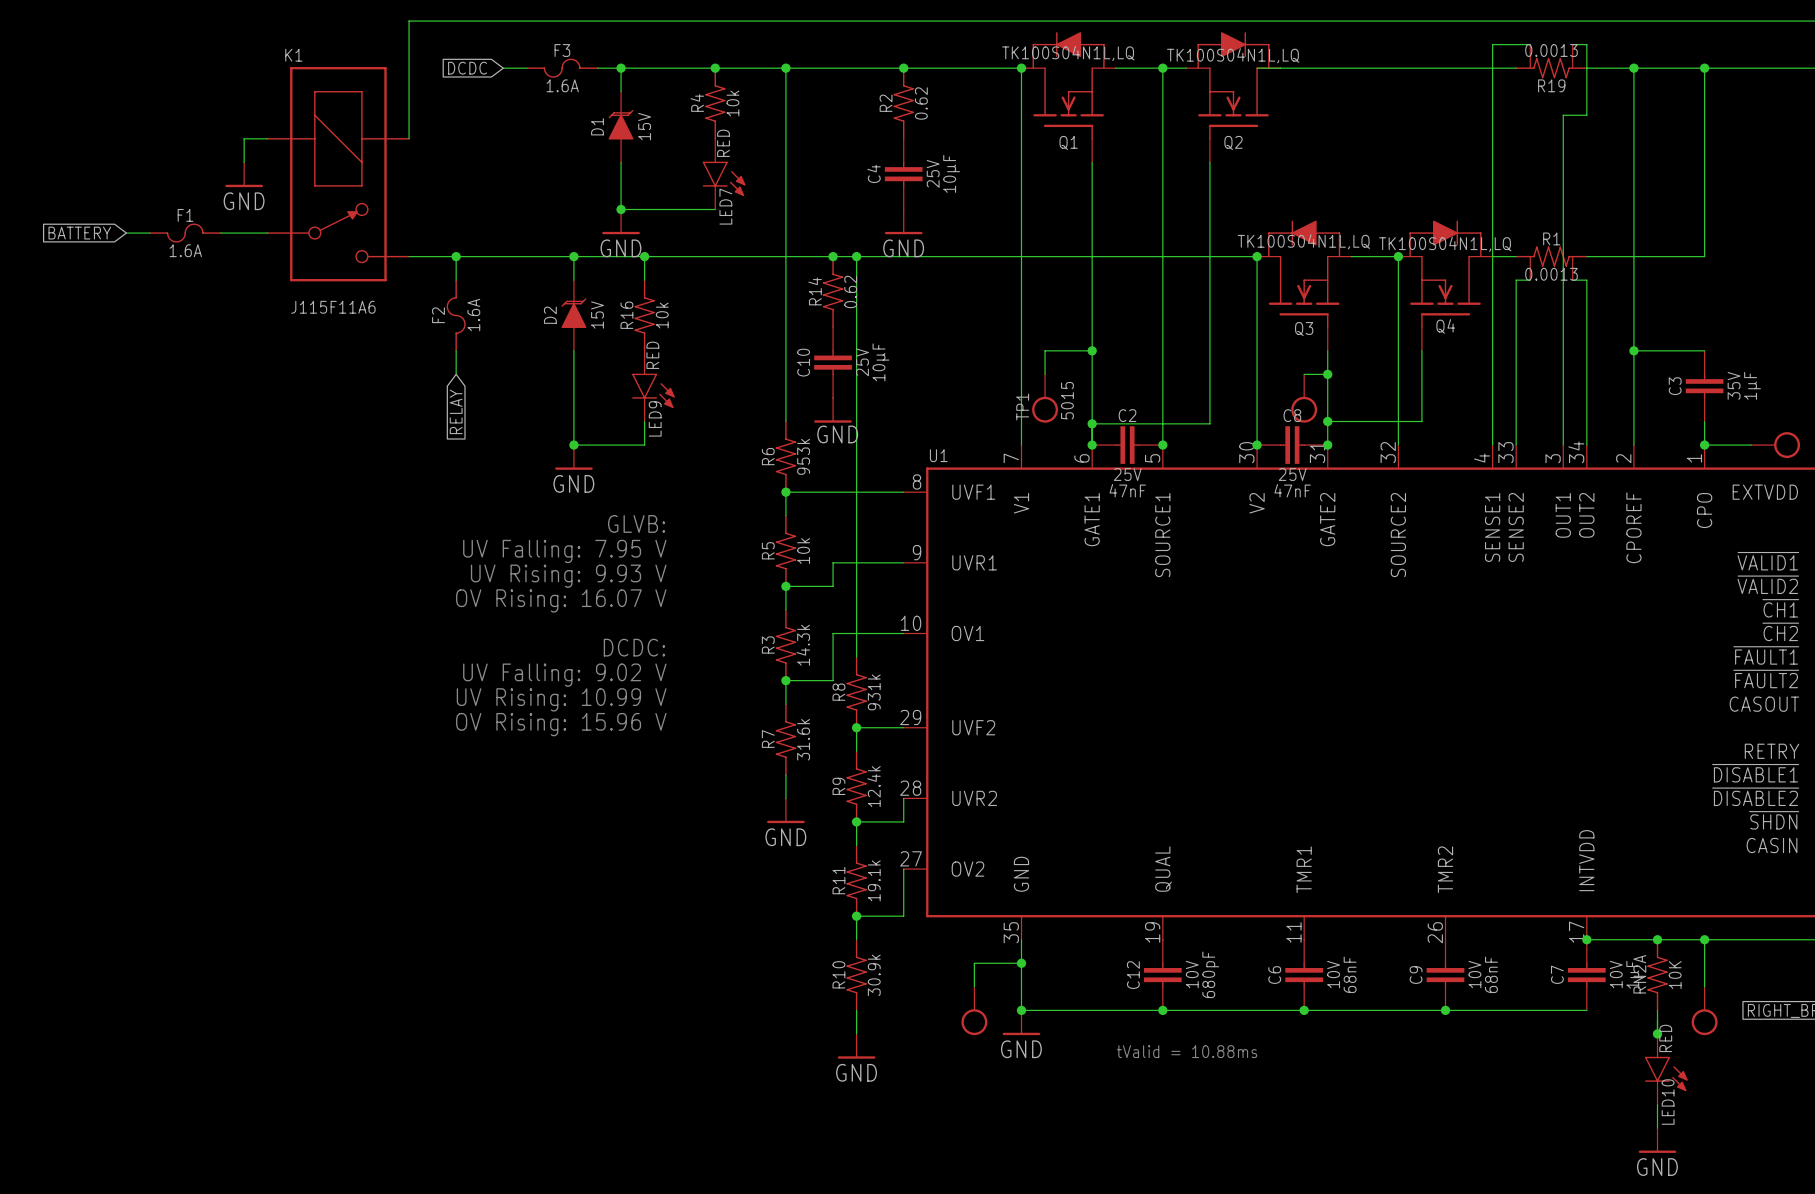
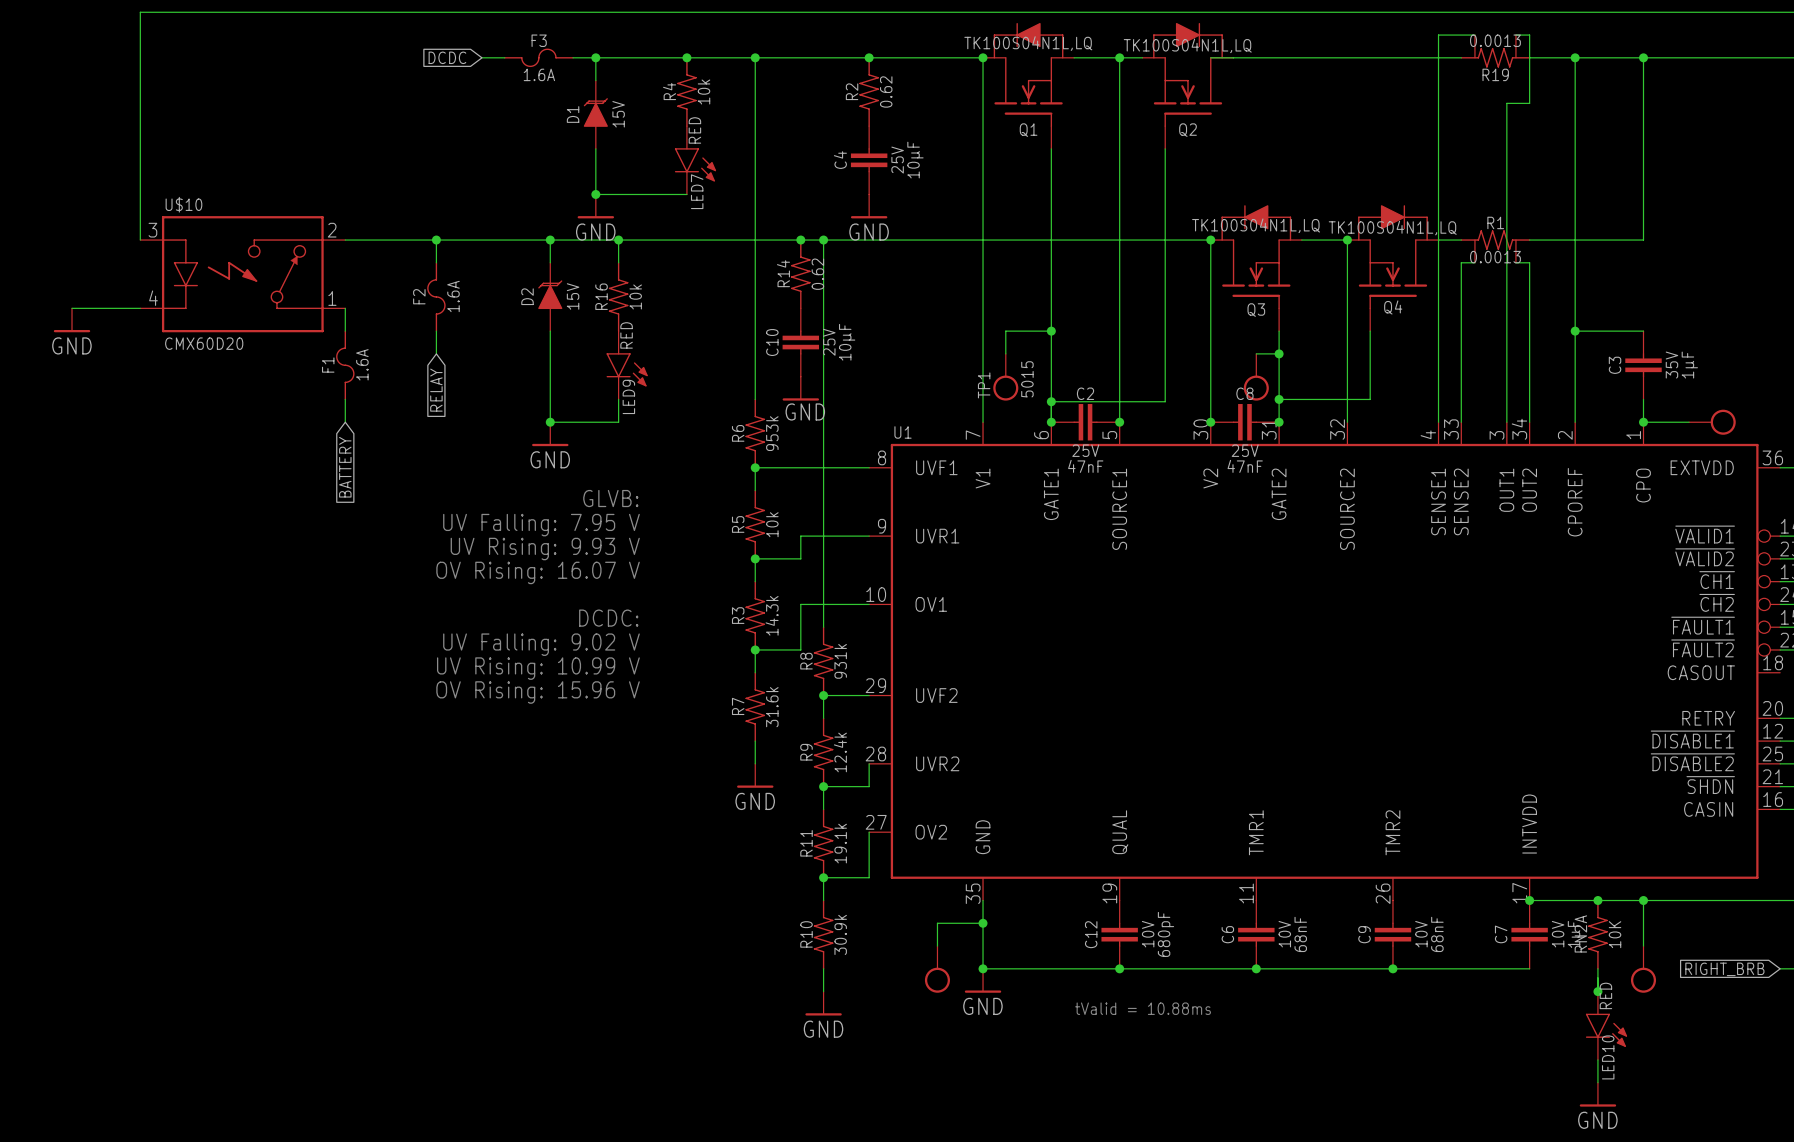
wire: (409, 21) (409, 138) -> (390, 12) (140, 12) (140, 240)
wire: (267, 138) (244, 138) (244, 162) -> none
power symbol: GND (244, 174) -> none
K1: J115F11A6 (338, 174) -> none
F1 name position: F1 (185, 215) -> F1 (328, 365)
global label: BATTERY (79, 233) -> none
wire: (126, 233) (149, 233) -> none
F1 rotation: 0° (185, 233) -> 90° clockwise (345, 365)
F1 position: (185, 233) -> (345, 365)
F1 text position: 1.6A (185, 250) -> 1.6A (362, 364)
U$10: none -> (242, 274)
wire: none -> (72, 308) (140, 308)
wire: none -> (345, 308) (345, 331)
power symbol: none -> GND (72, 320)
wire: none -> (345, 399) (345, 422)
global label: none -> BATTERY (345, 467)

